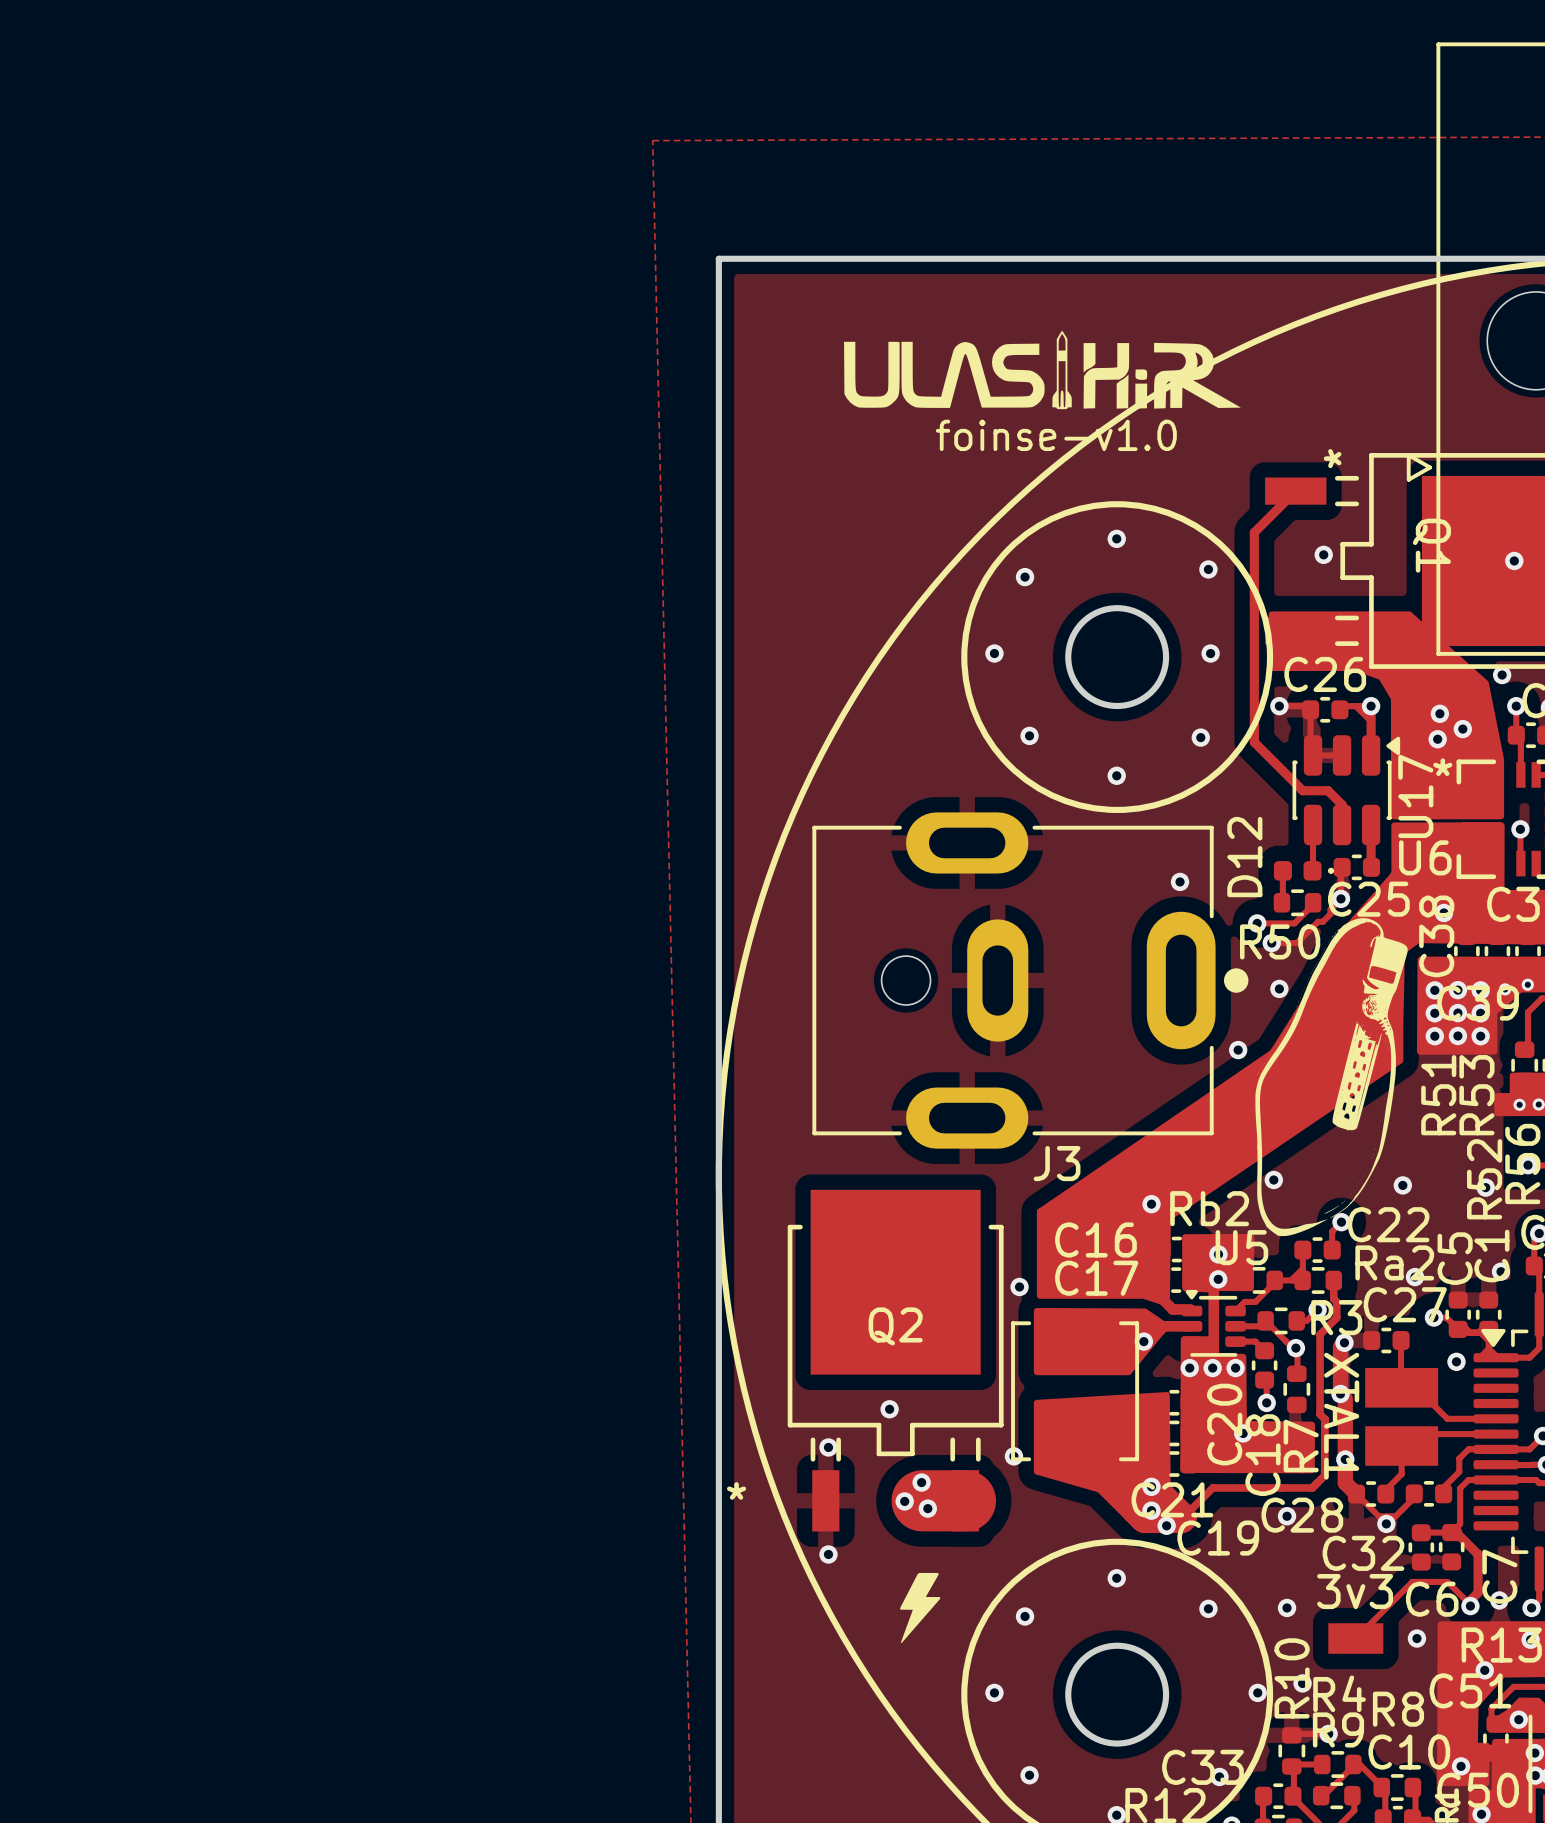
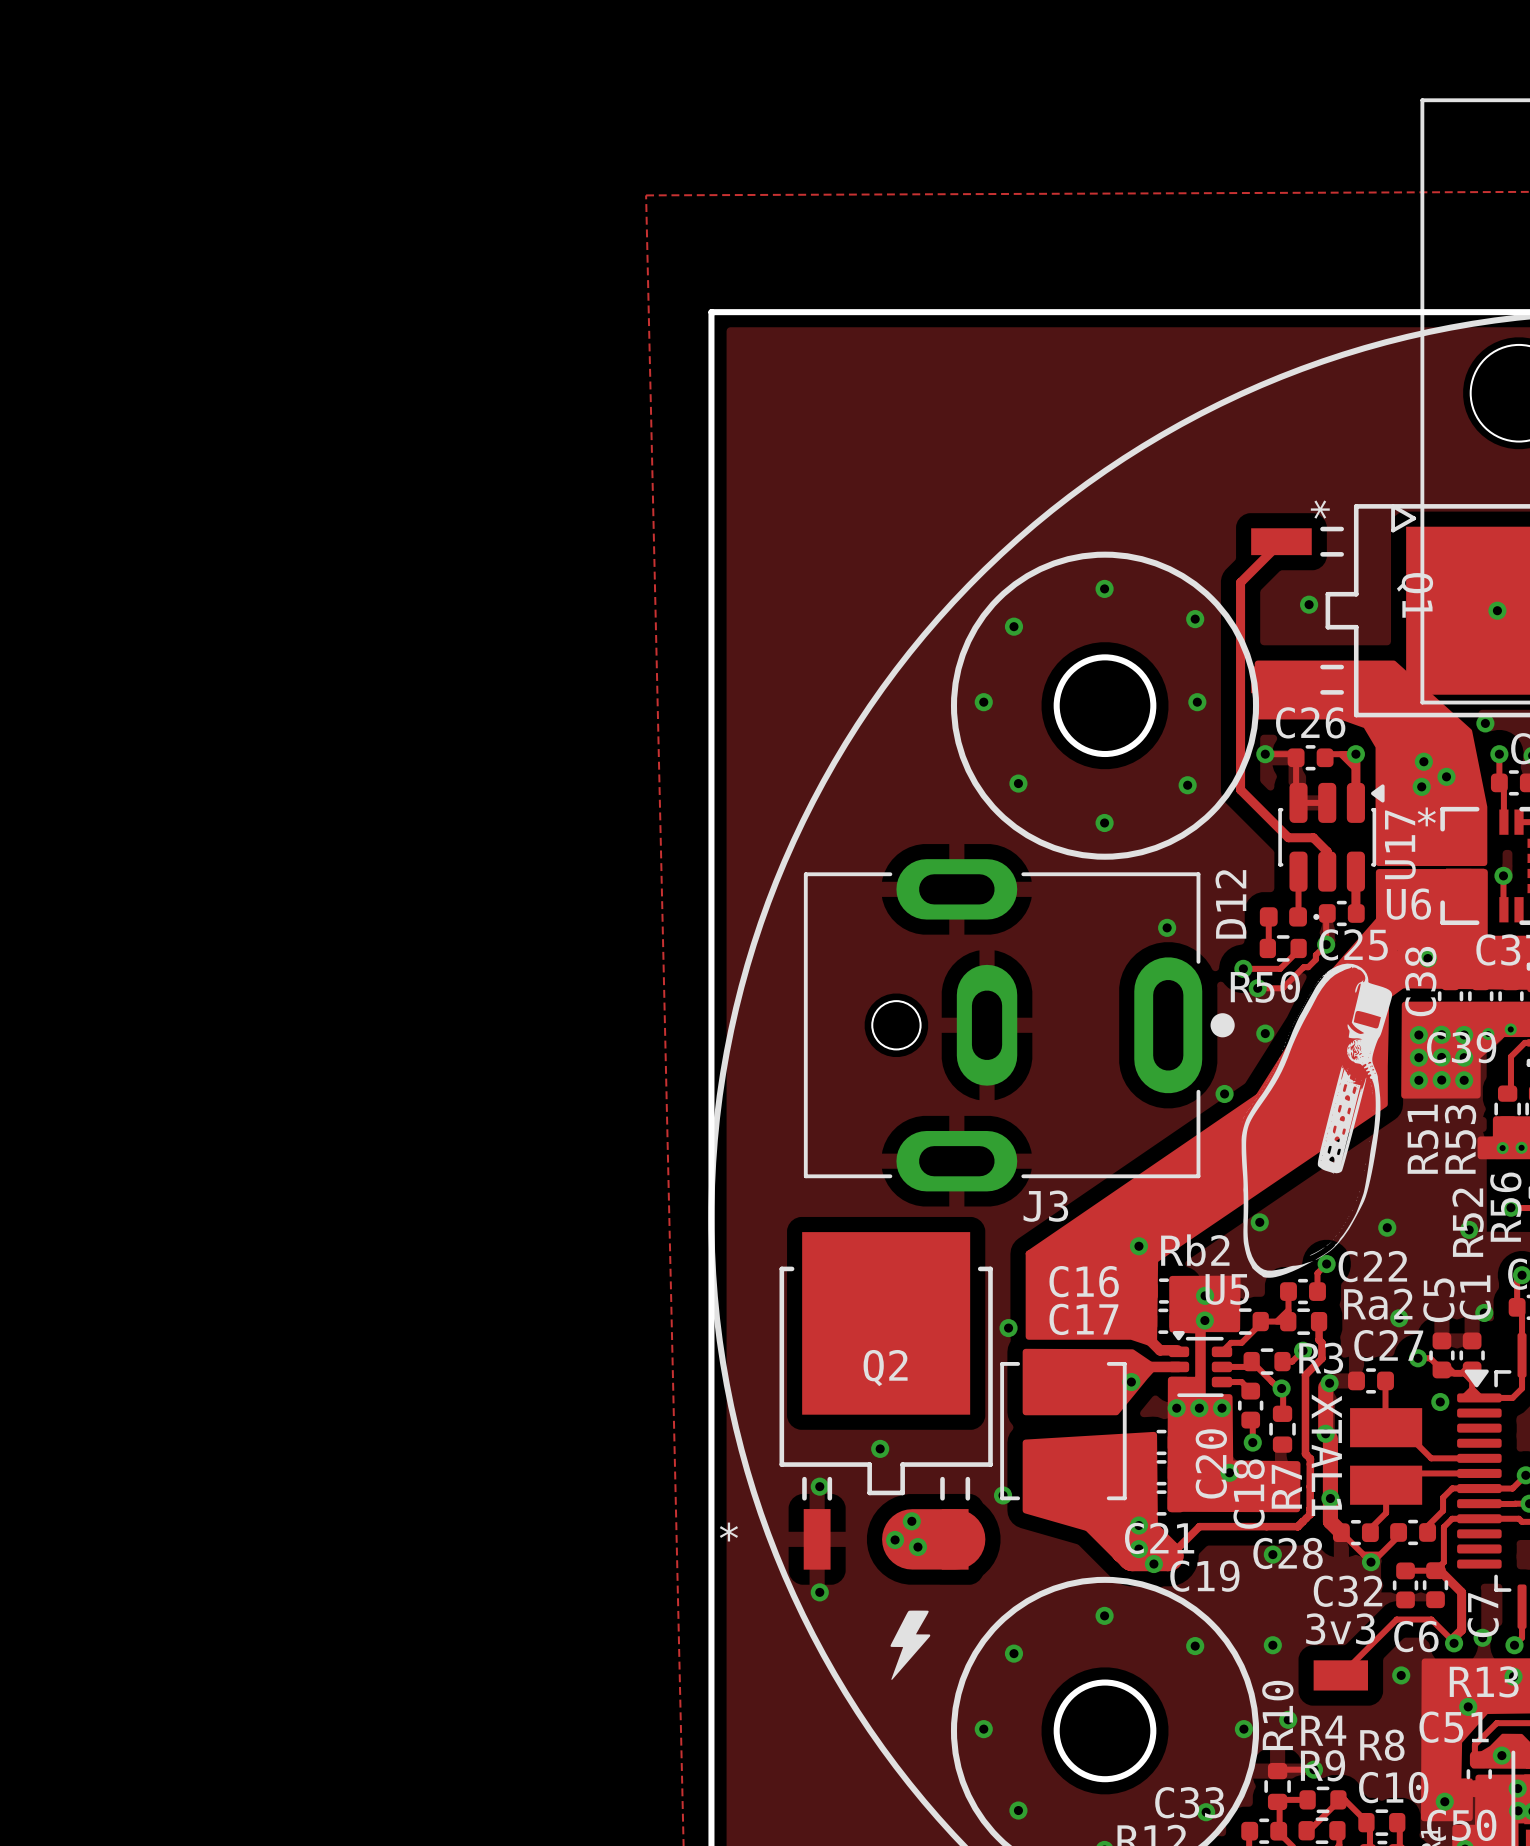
drawing: [844, 330, 1241, 410] -> none
text: foinse-v1.0 (1056, 435) -> none

